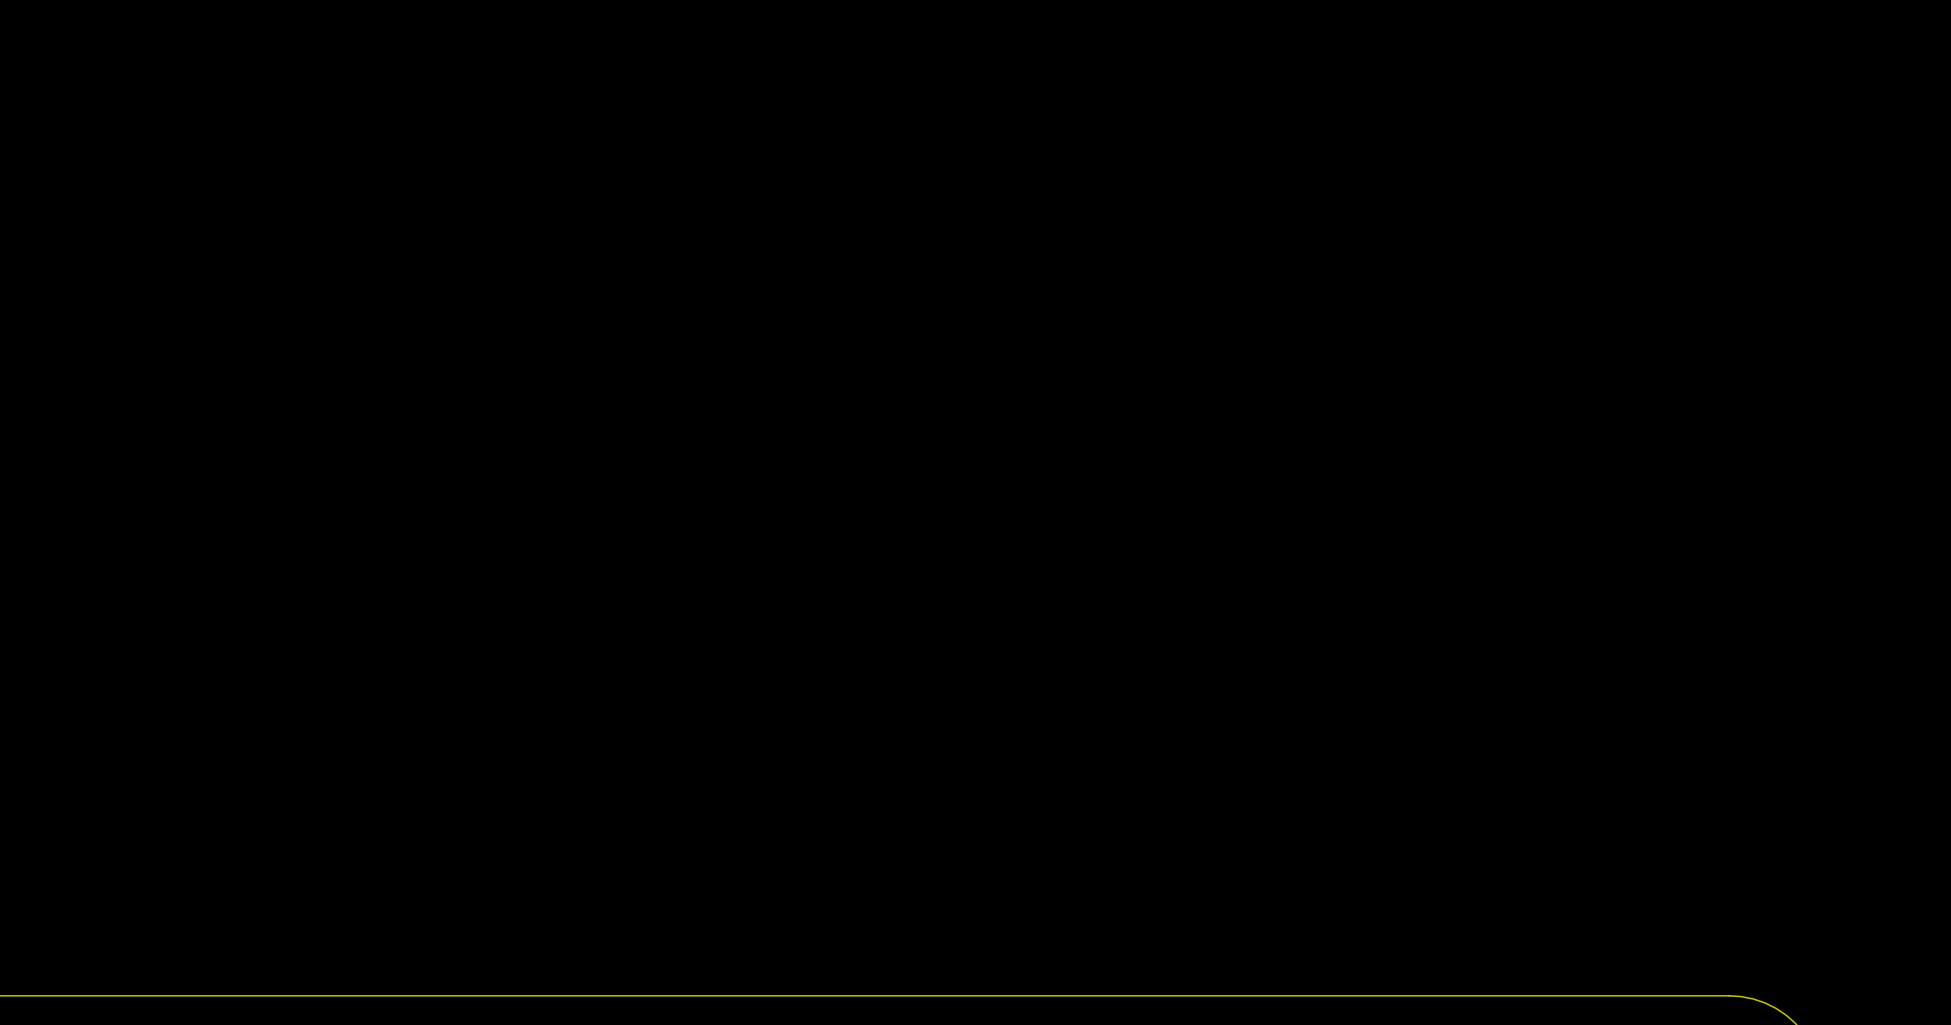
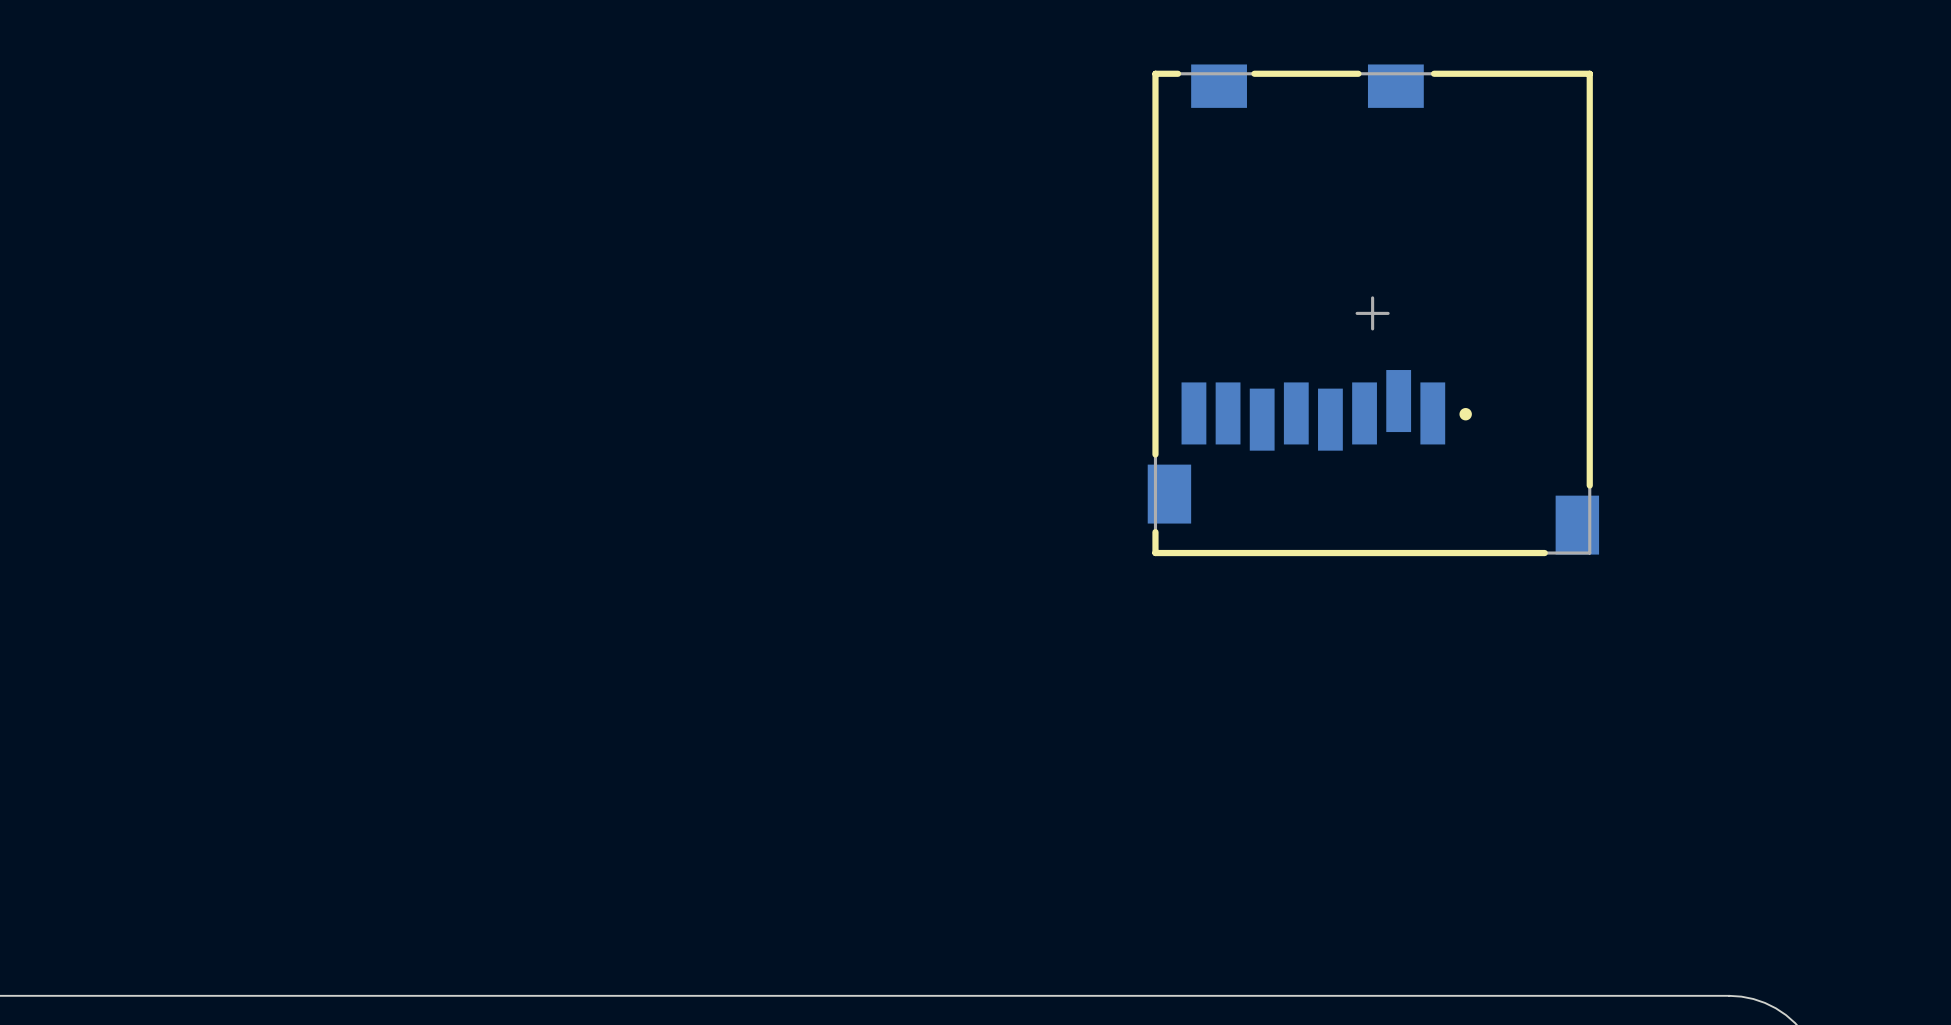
part: none -> (1373, 310)

